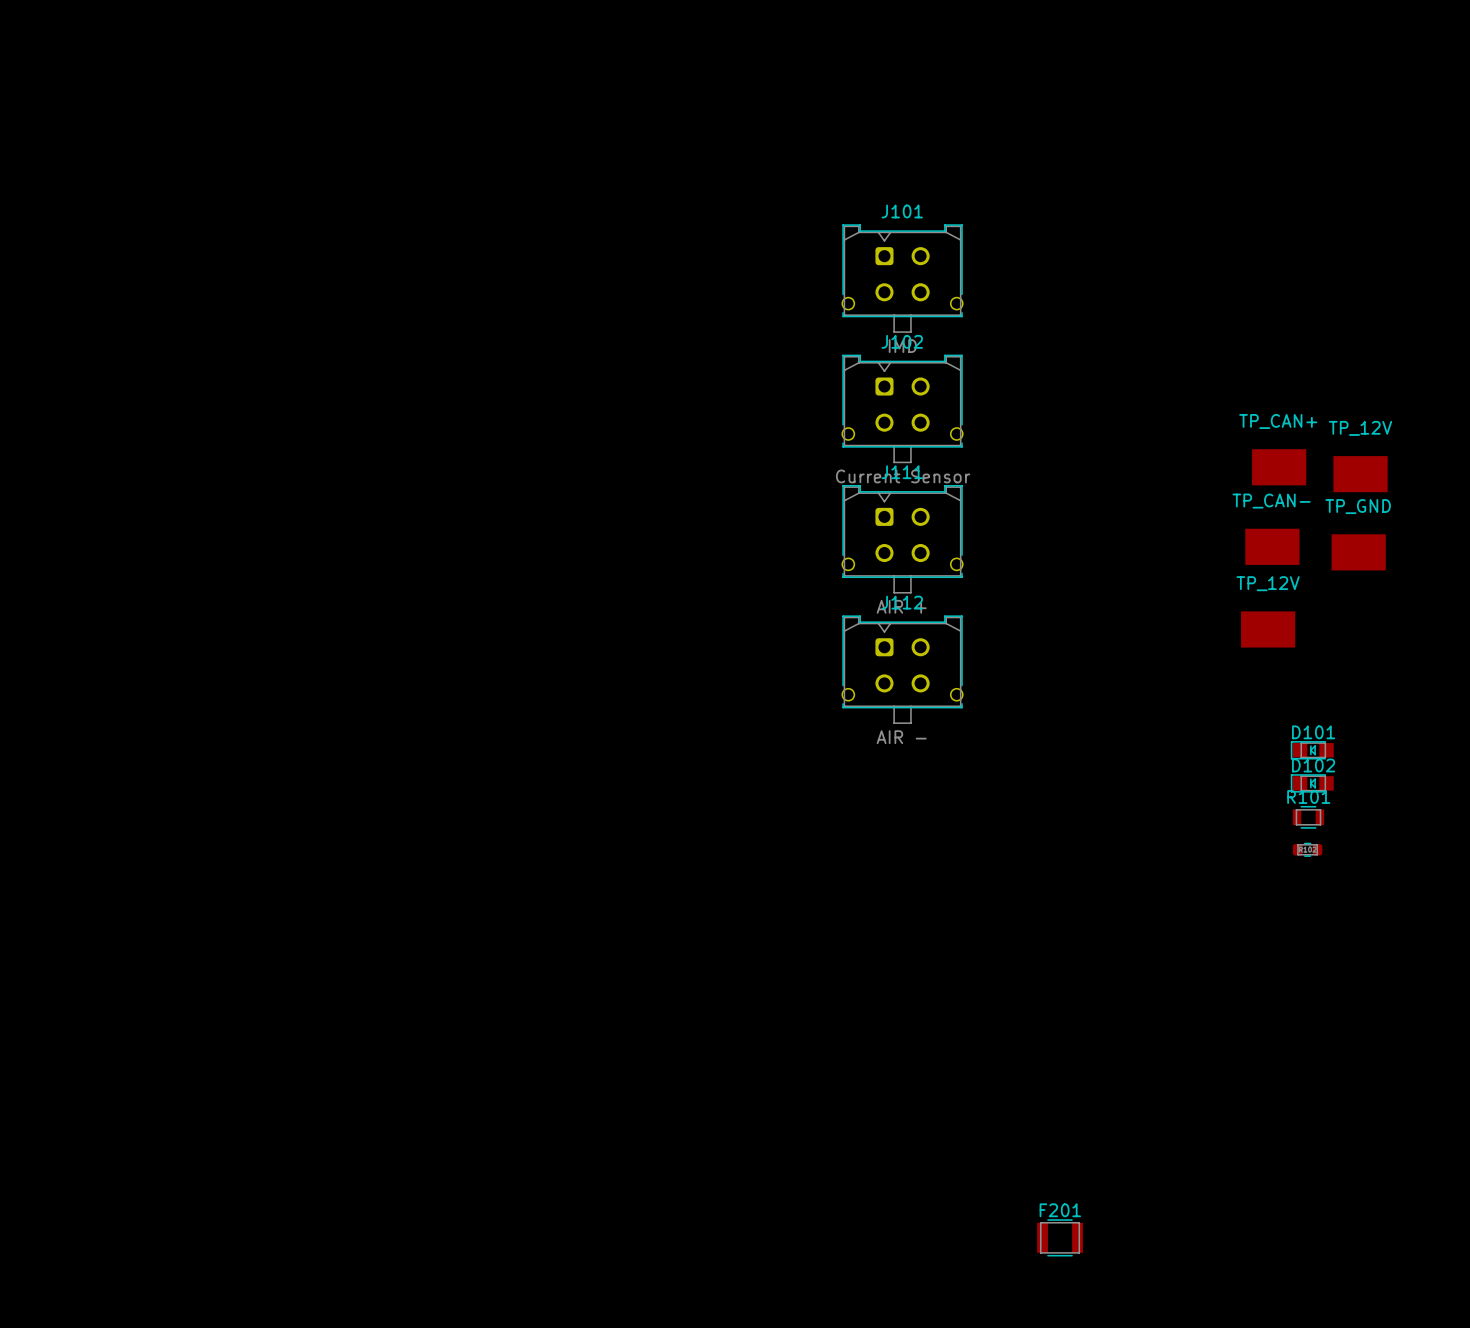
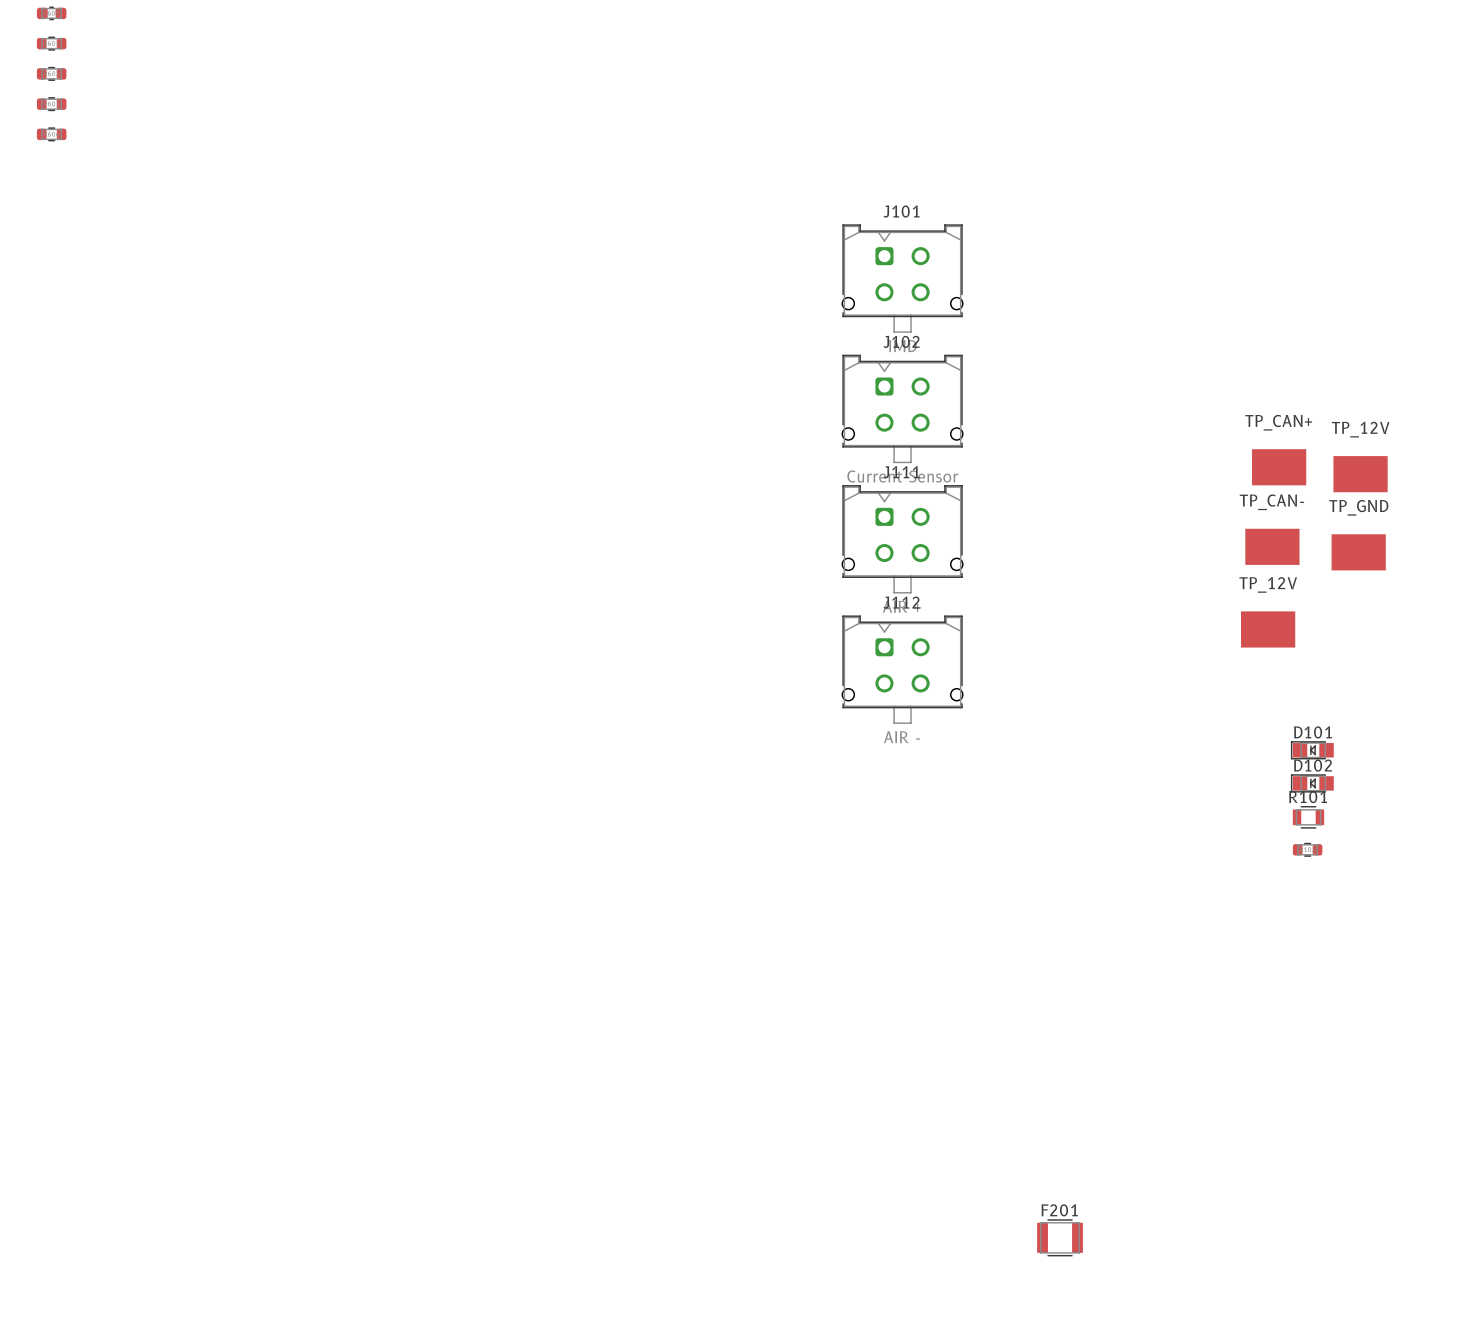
part: none -> (51, 13)
part: none -> (51, 43)
part: none -> (51, 73)
part: none -> (51, 104)
part: none -> (51, 134)

